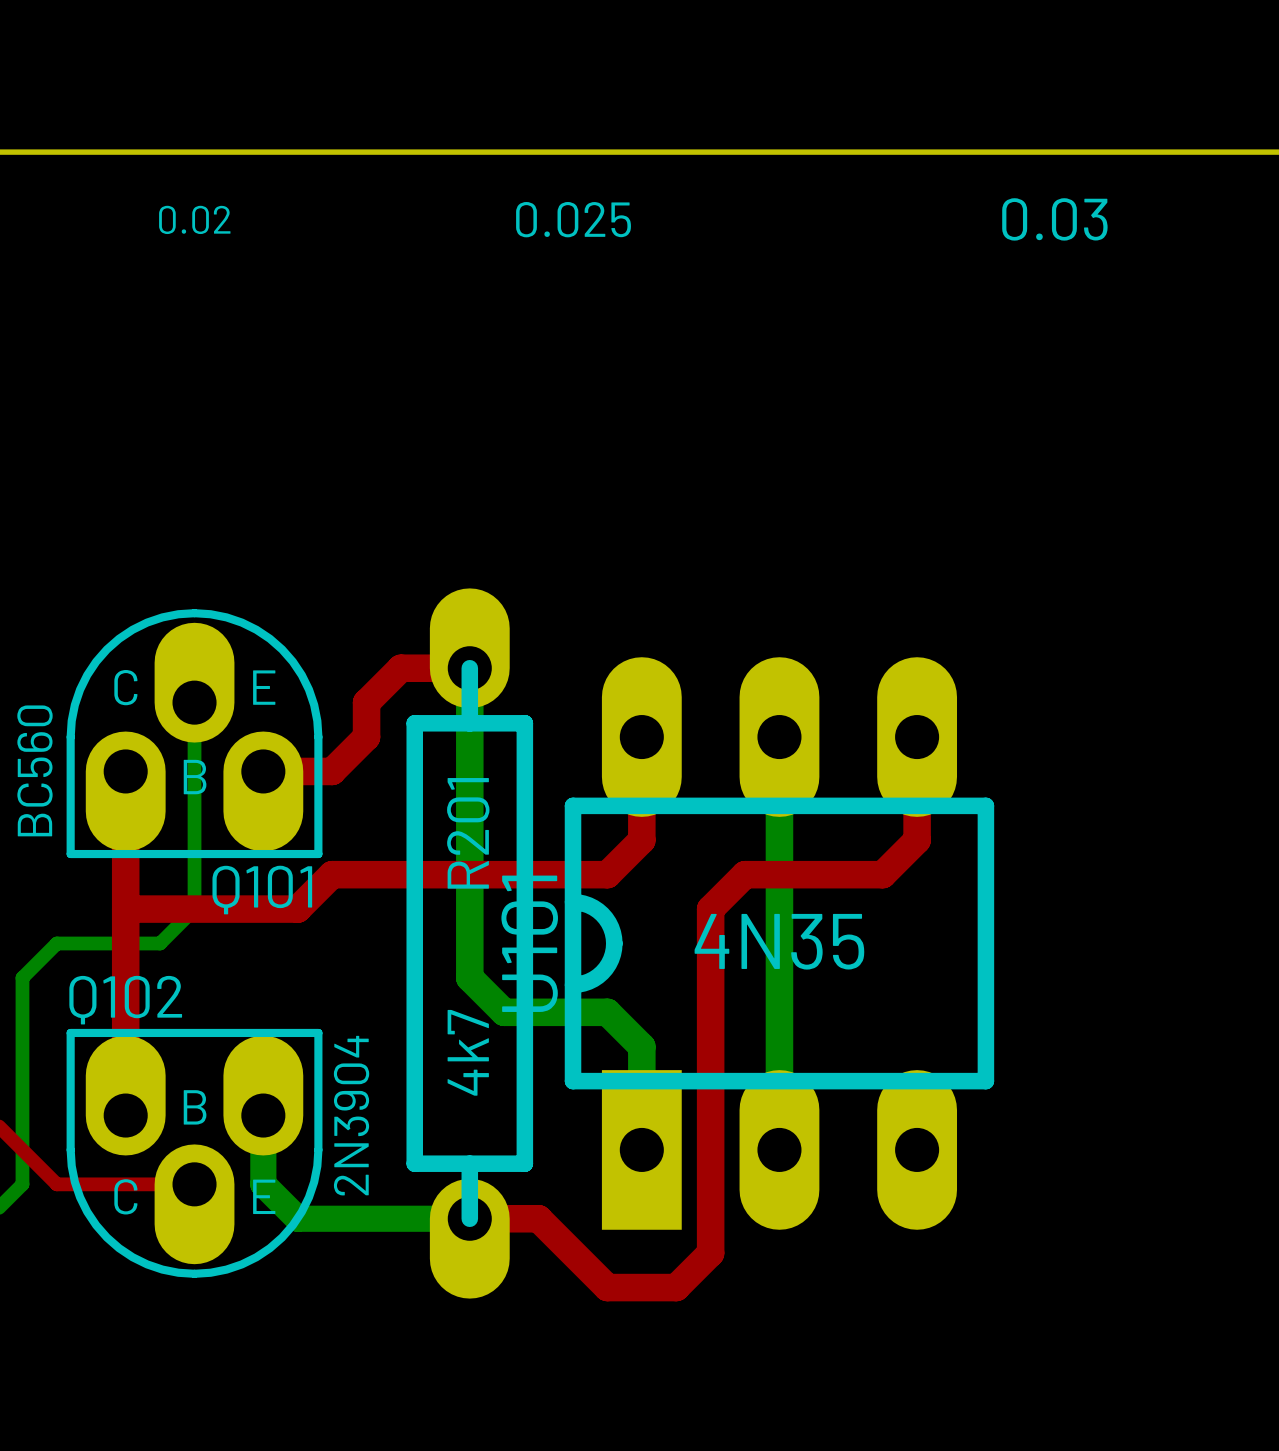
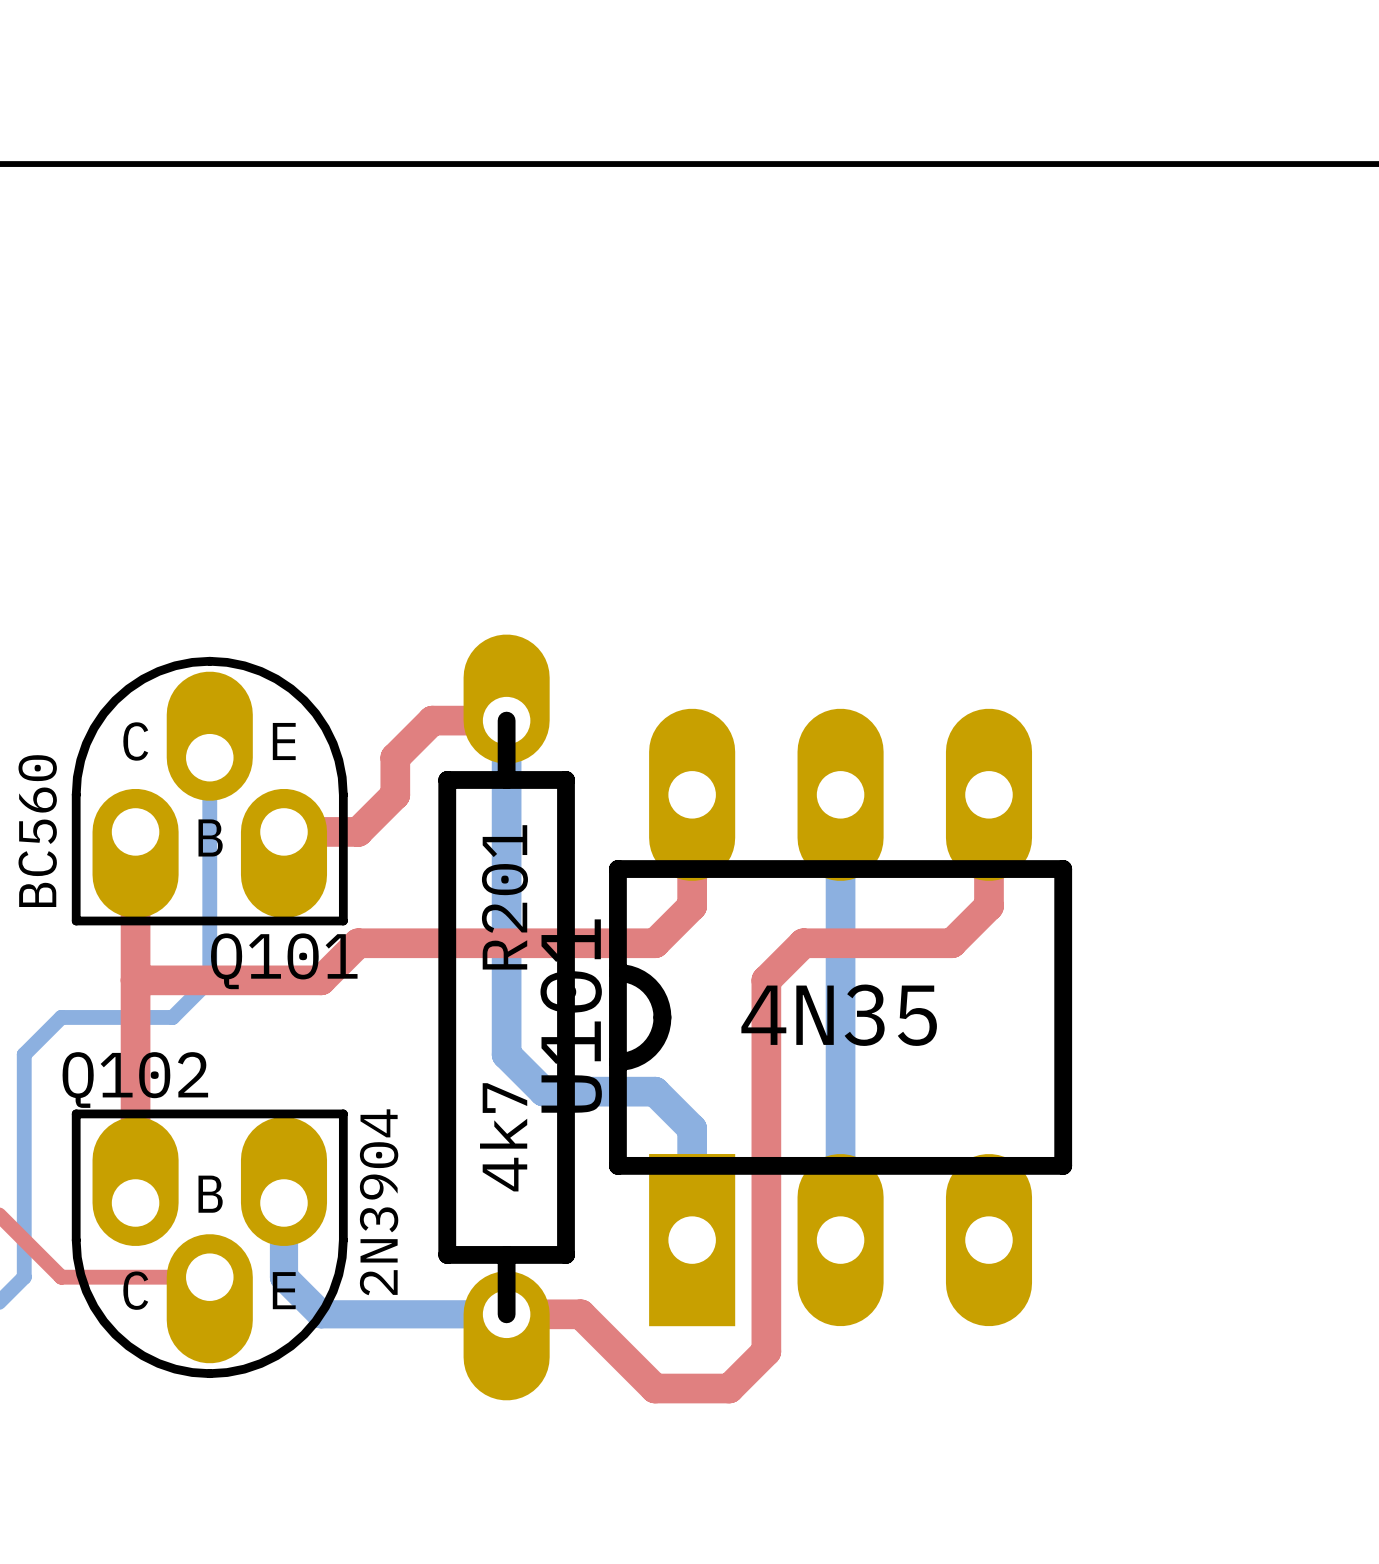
text: 0.02 (194, 219) -> none
text: 0.025 (573, 219) -> none
text: 0.03 (1054, 219) -> none

